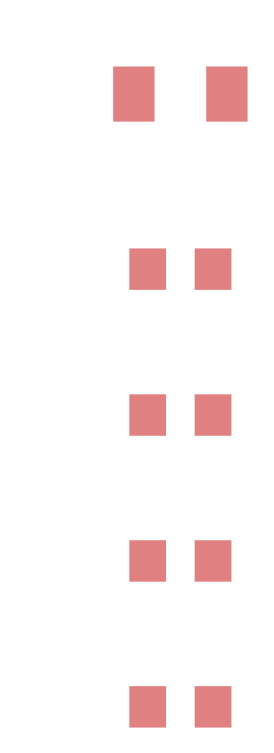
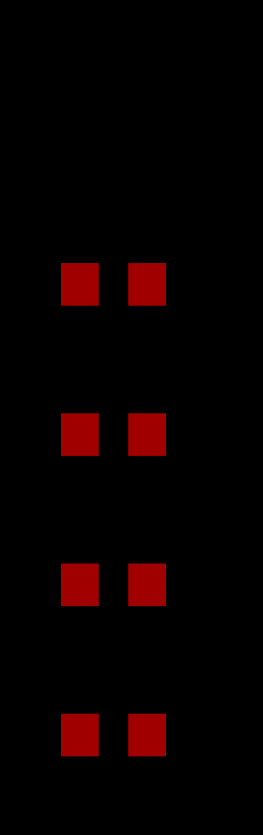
part: (180, 94) -> none

